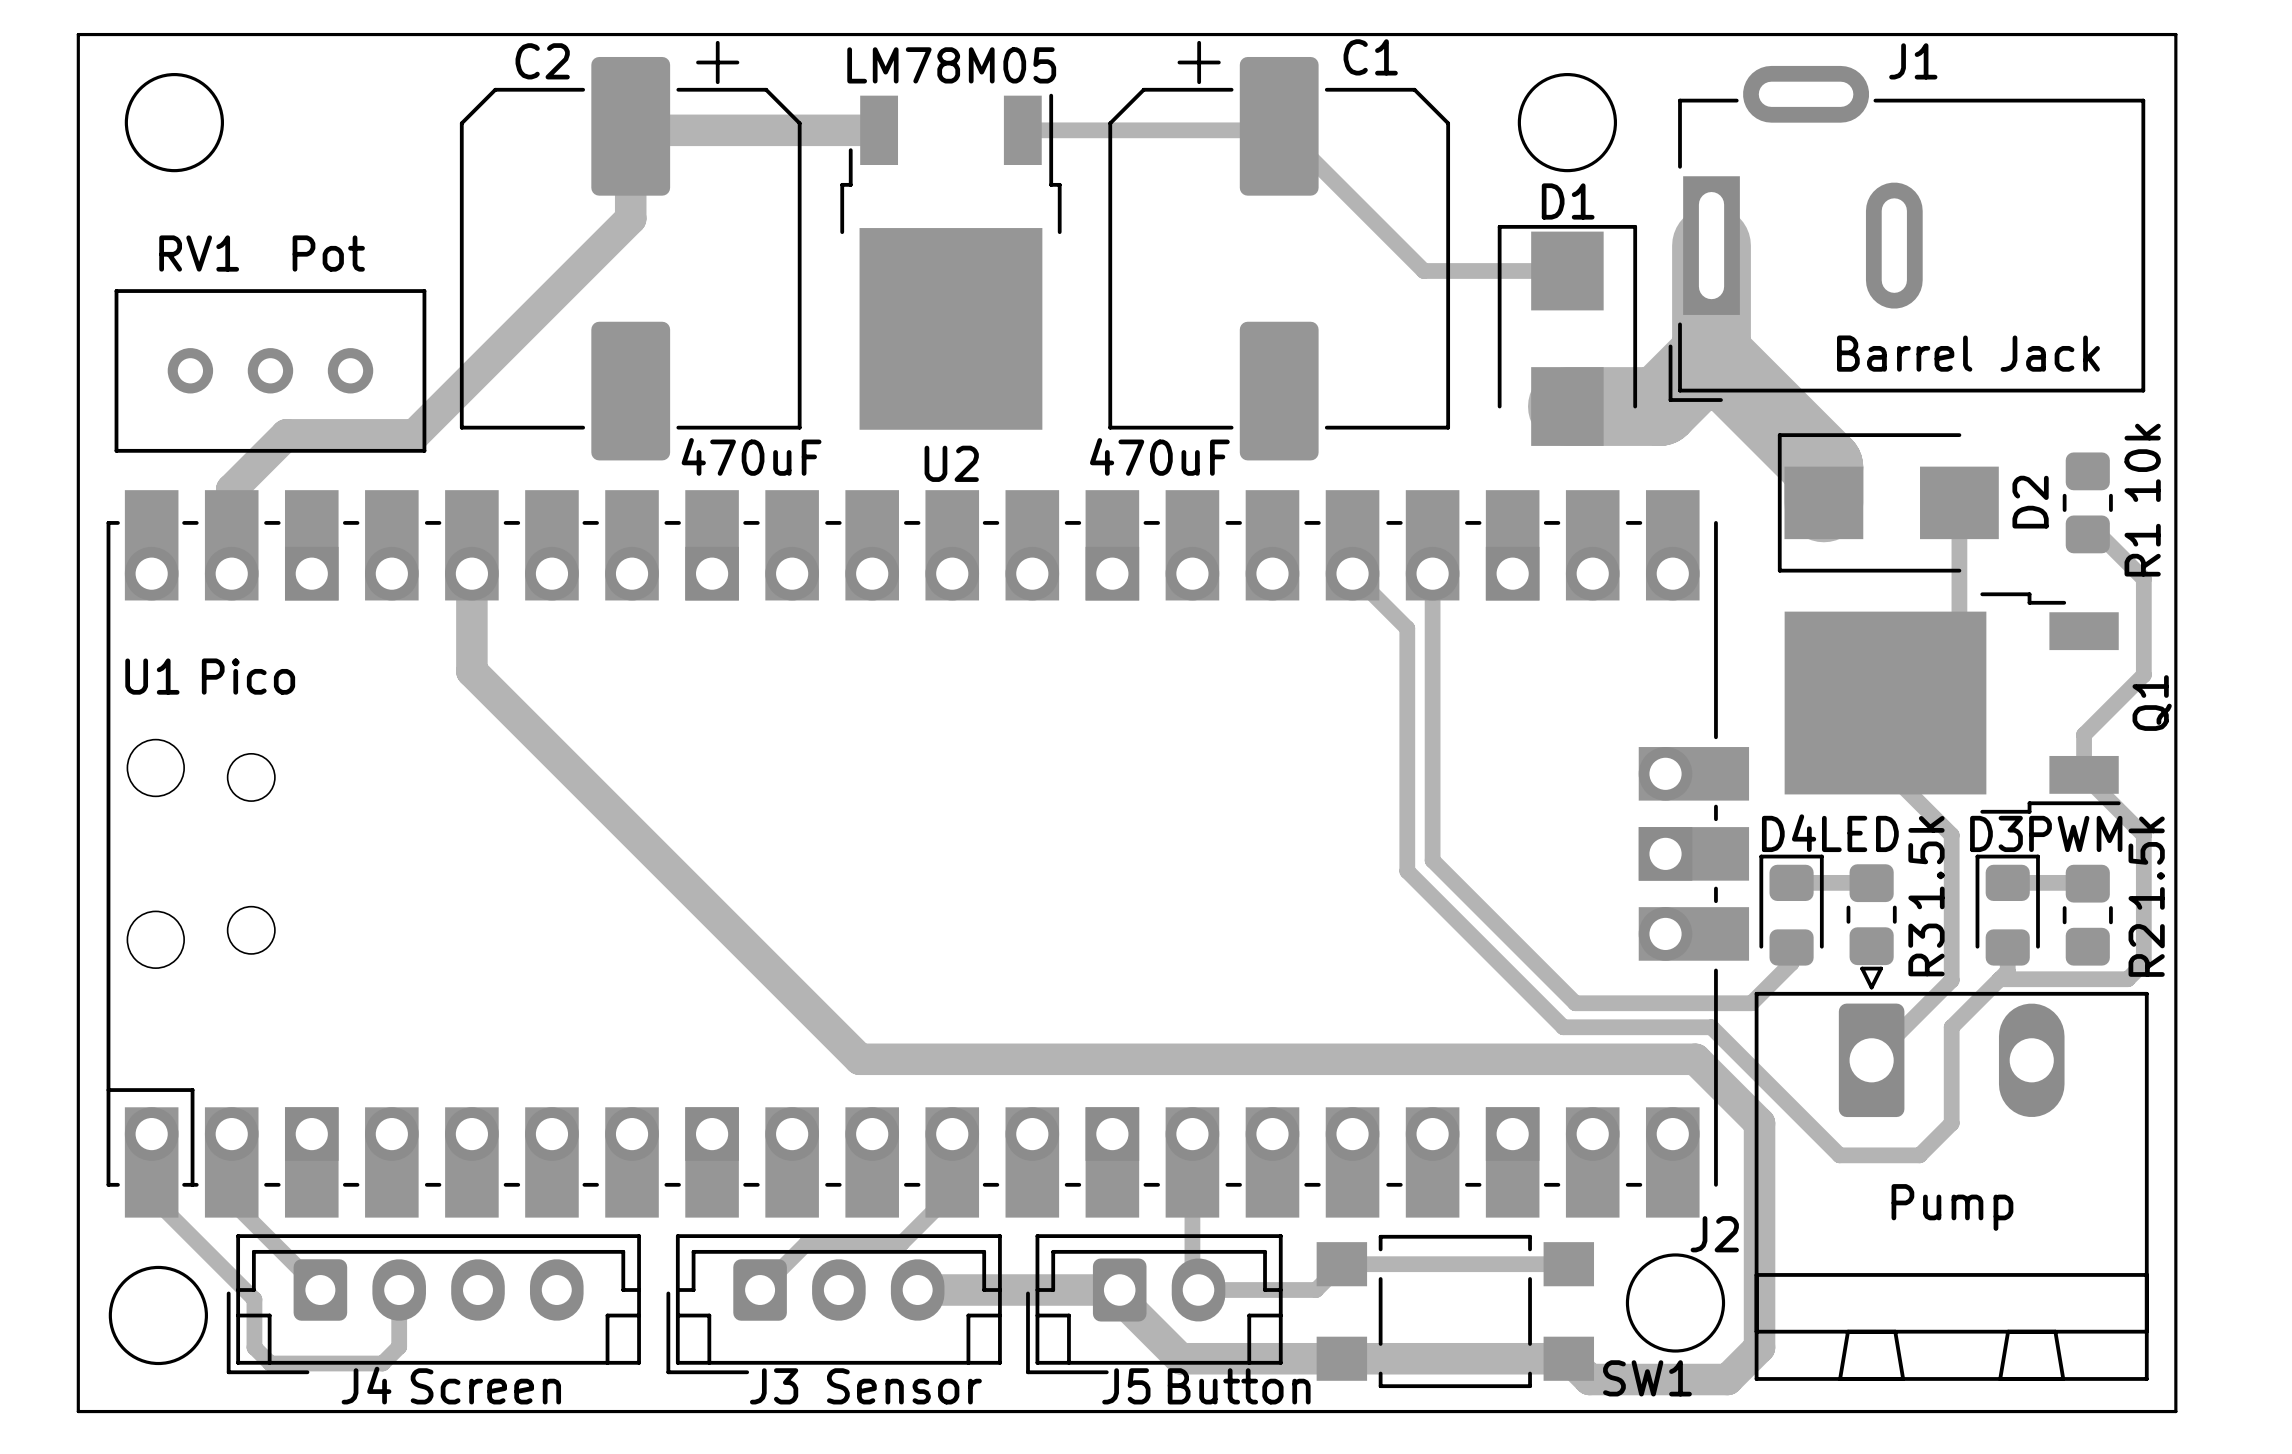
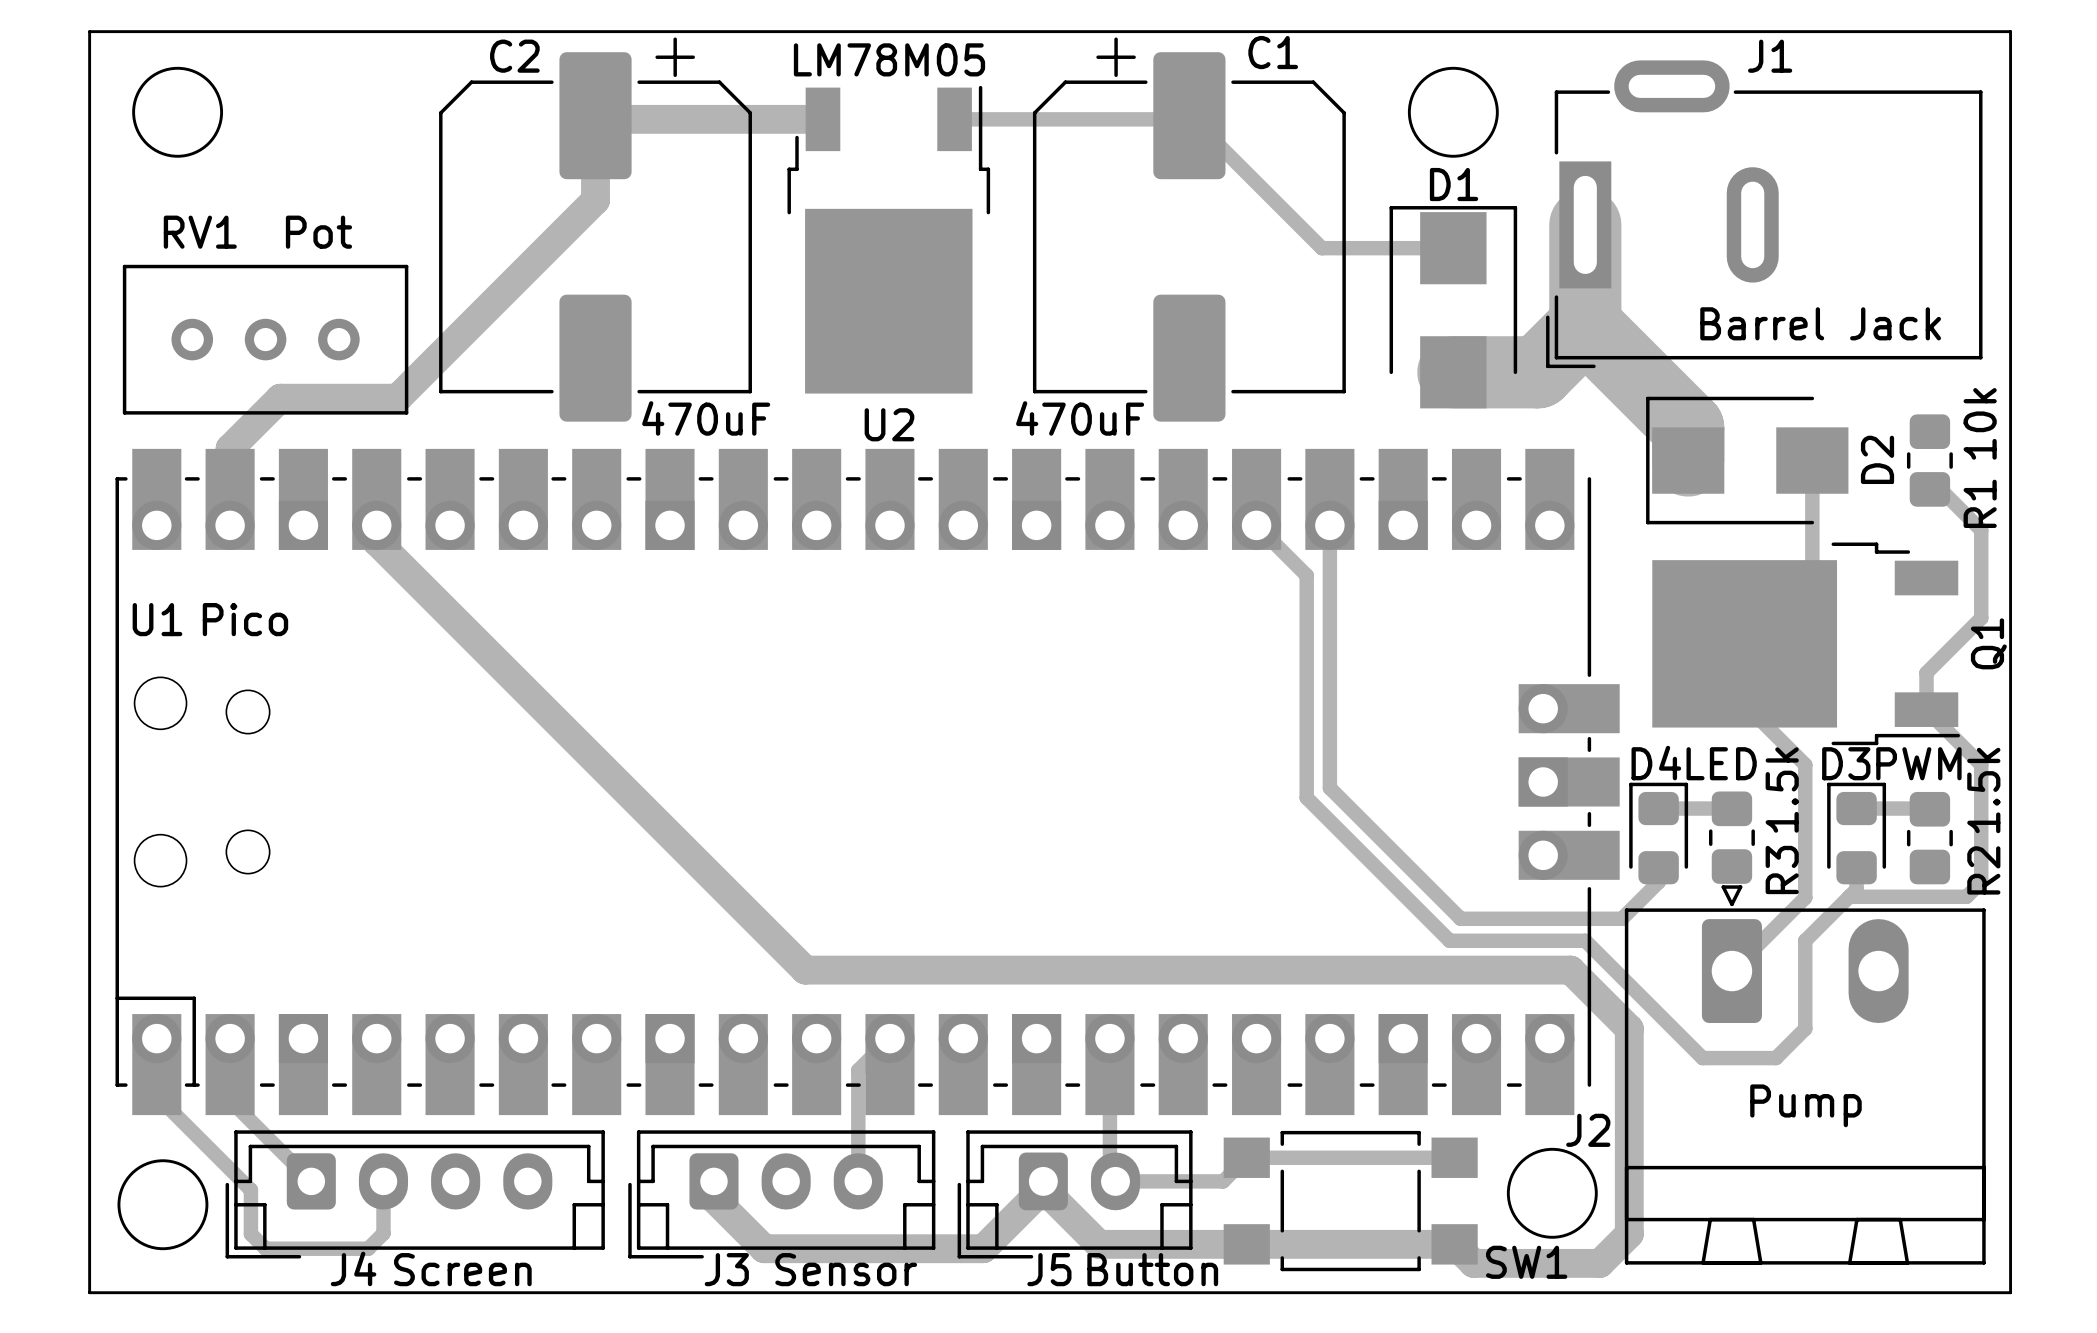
track: (471, 573) (471, 671) -> (376, 525) (376, 541) (450, 614)
track: (952, 1134) (952, 1192) (901, 1243) (806, 1243) (760, 1290) -> (889, 1038) (858, 1070) (858, 1181)
track: none -> (713, 1181) (713, 1198) (764, 1248) (983, 1248) (1043, 1188)
track: (917, 1290) (1119, 1290) -> none

